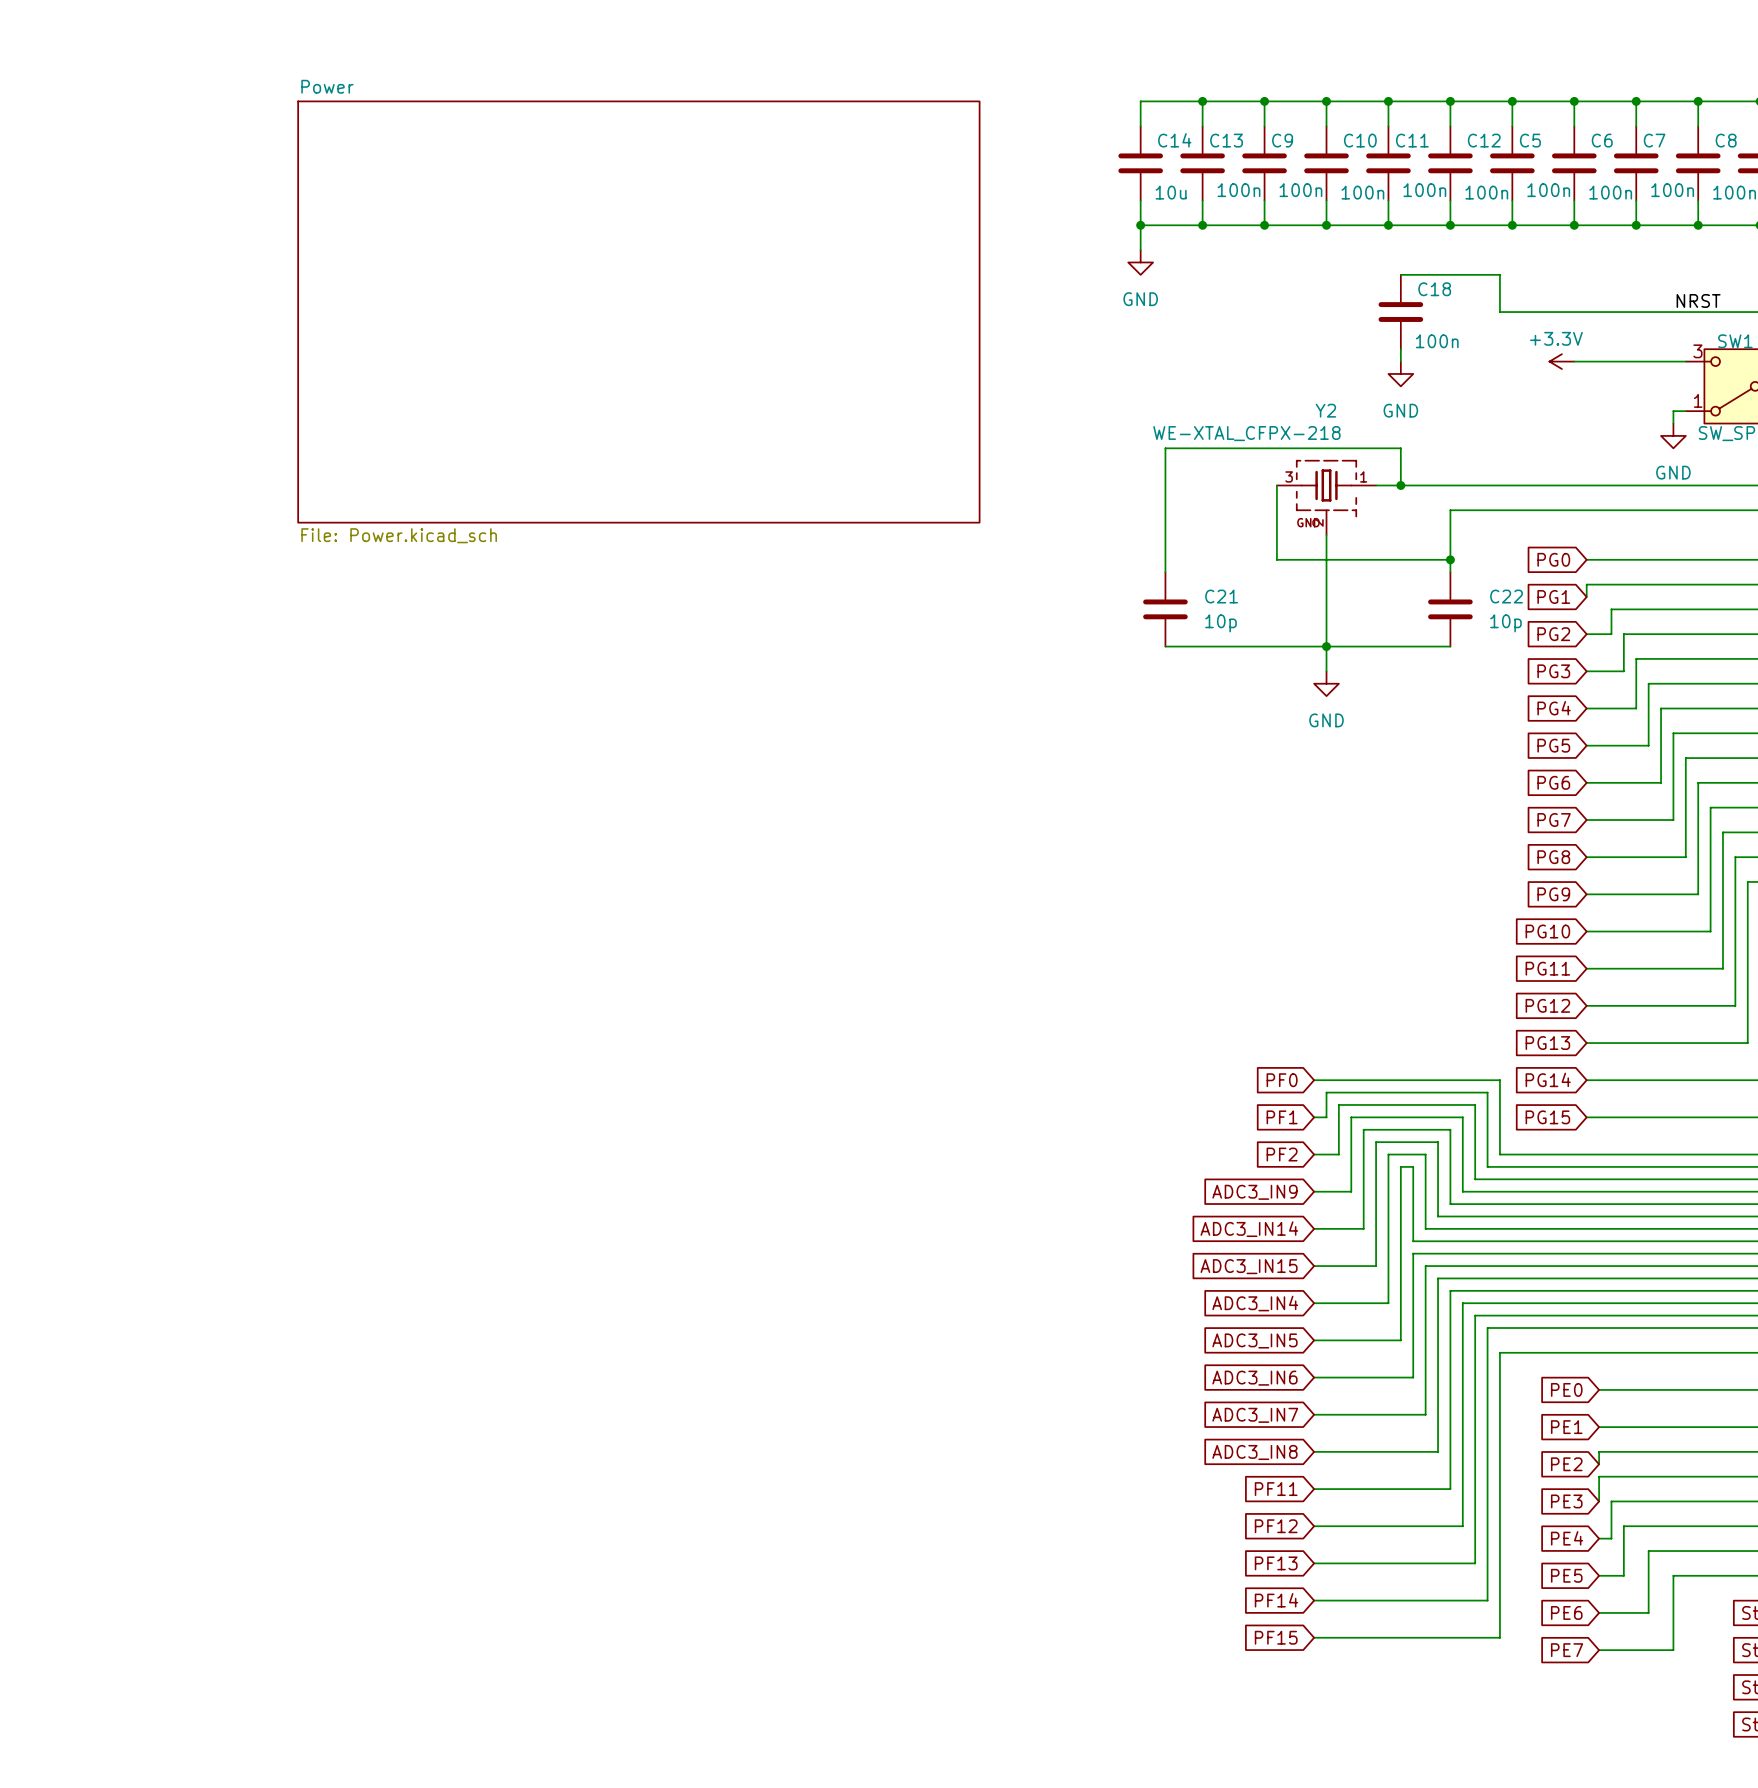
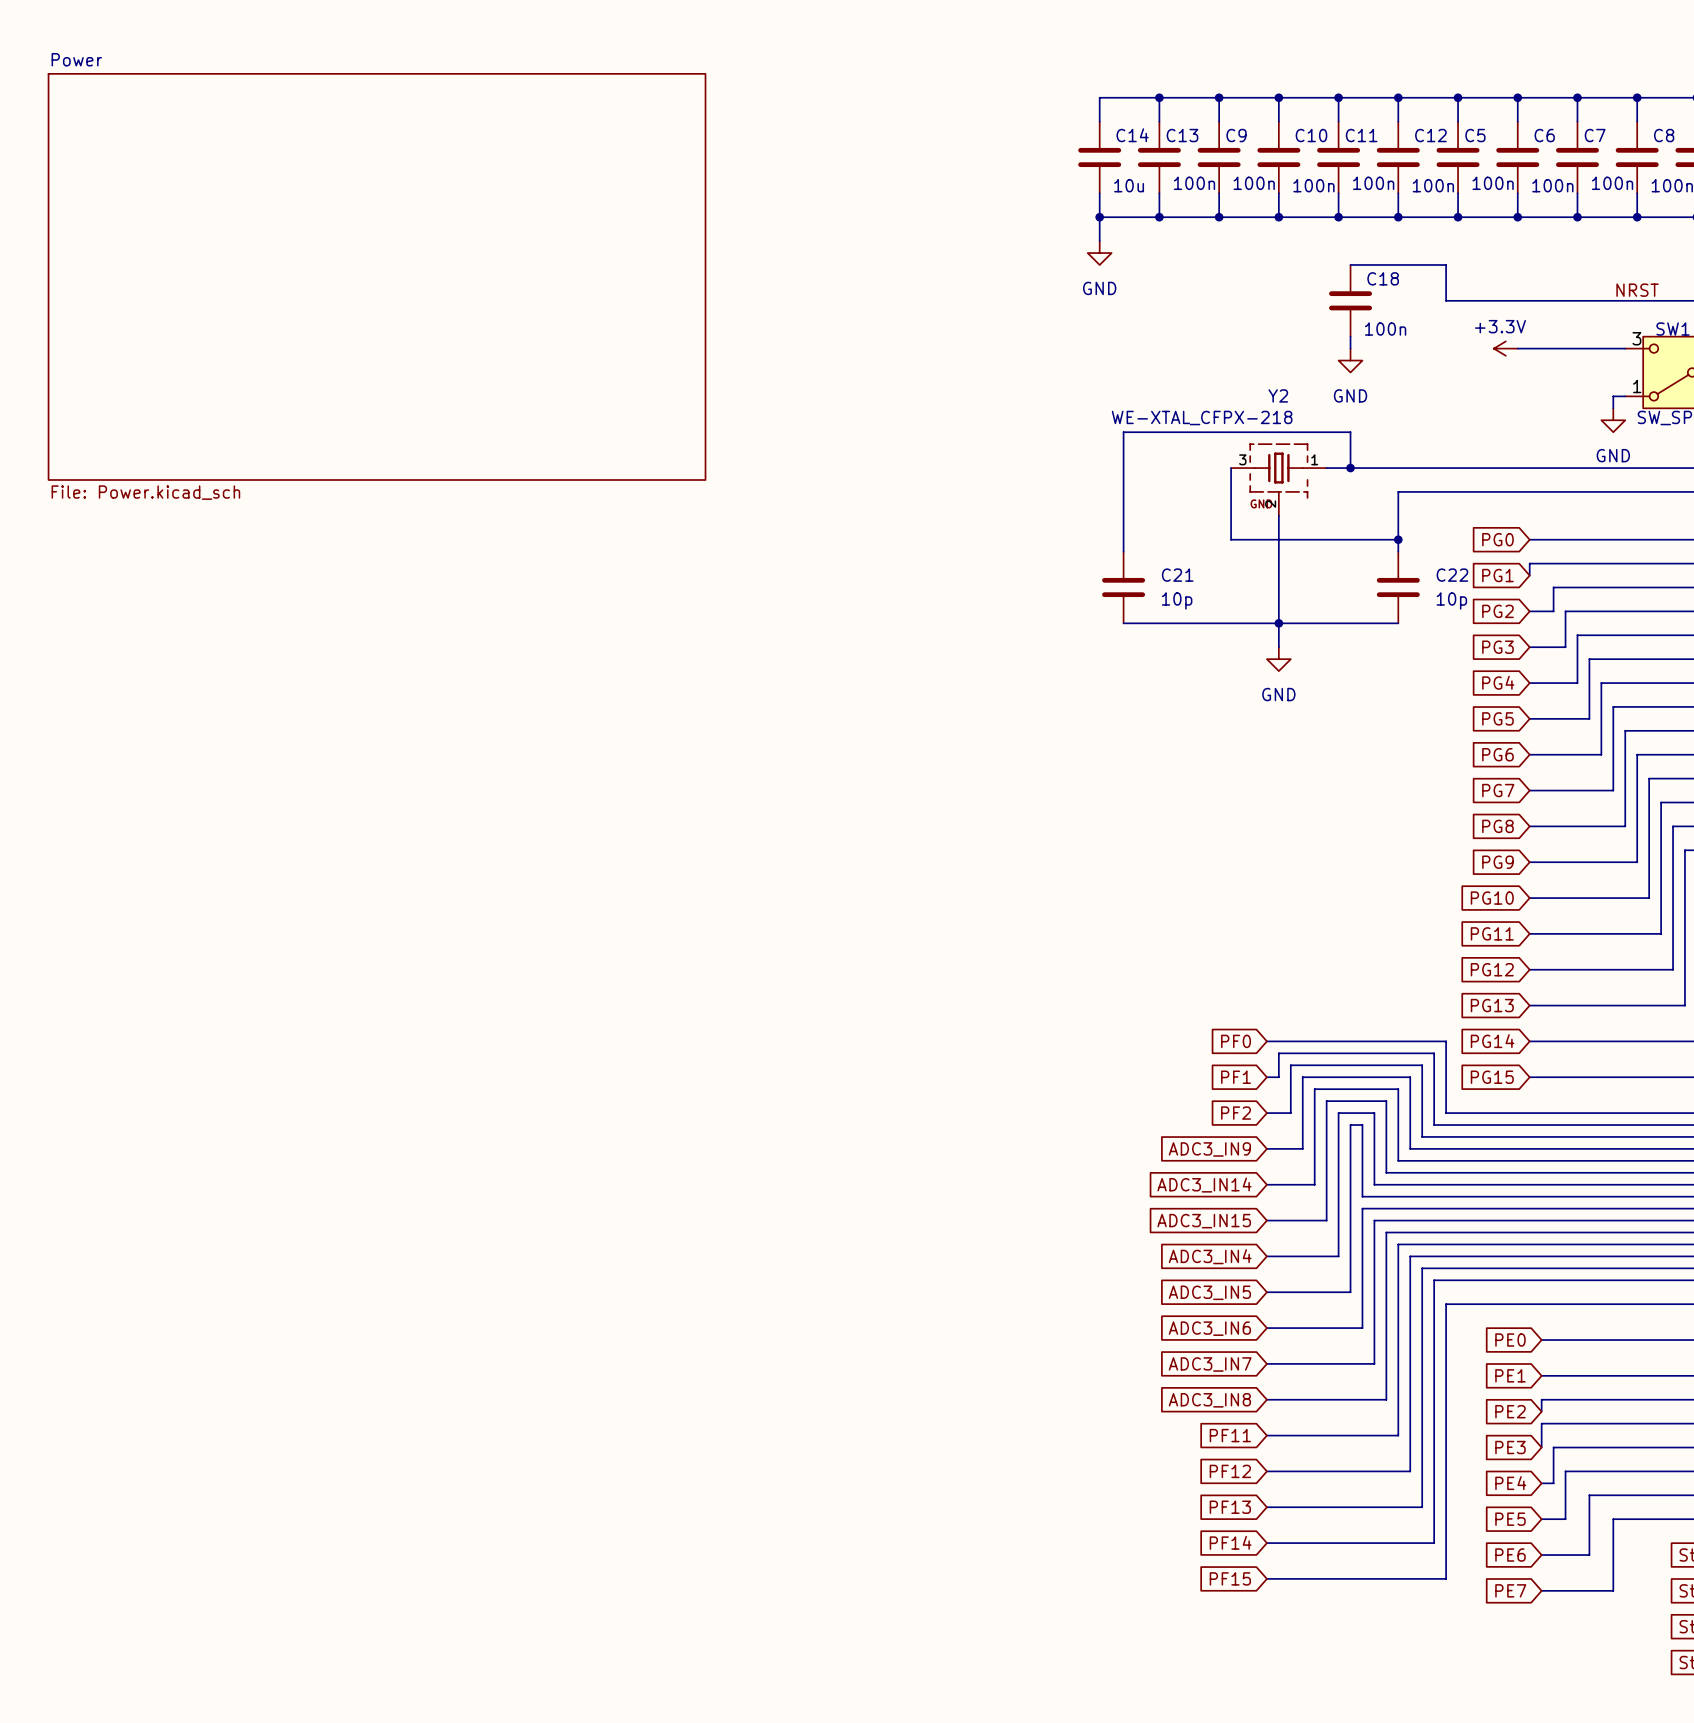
sheet Power: none -> File: Power.kicad_sch (377, 276)
sheet Power: File: Power.kicad_sch (638, 312) -> none

